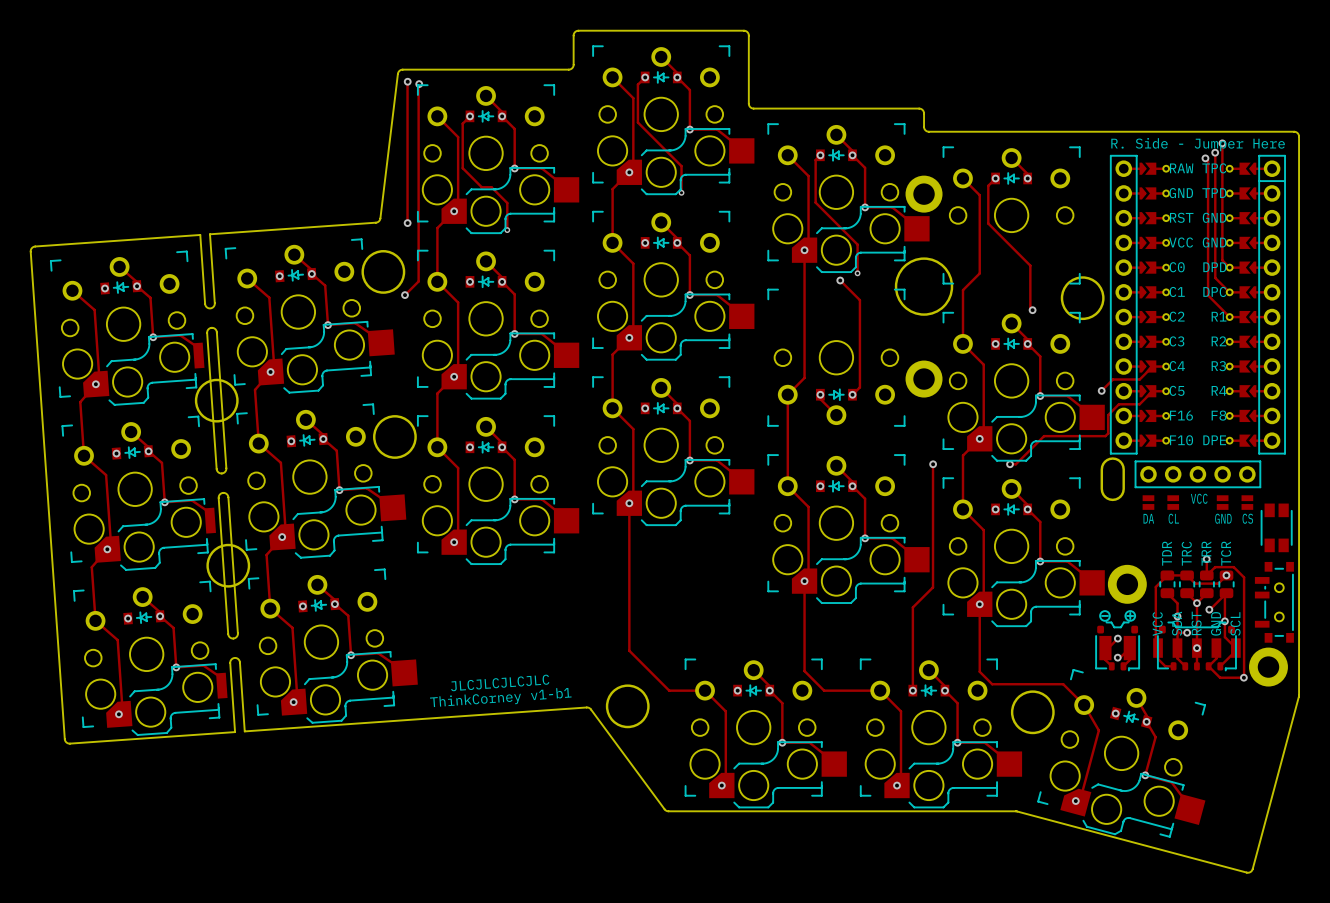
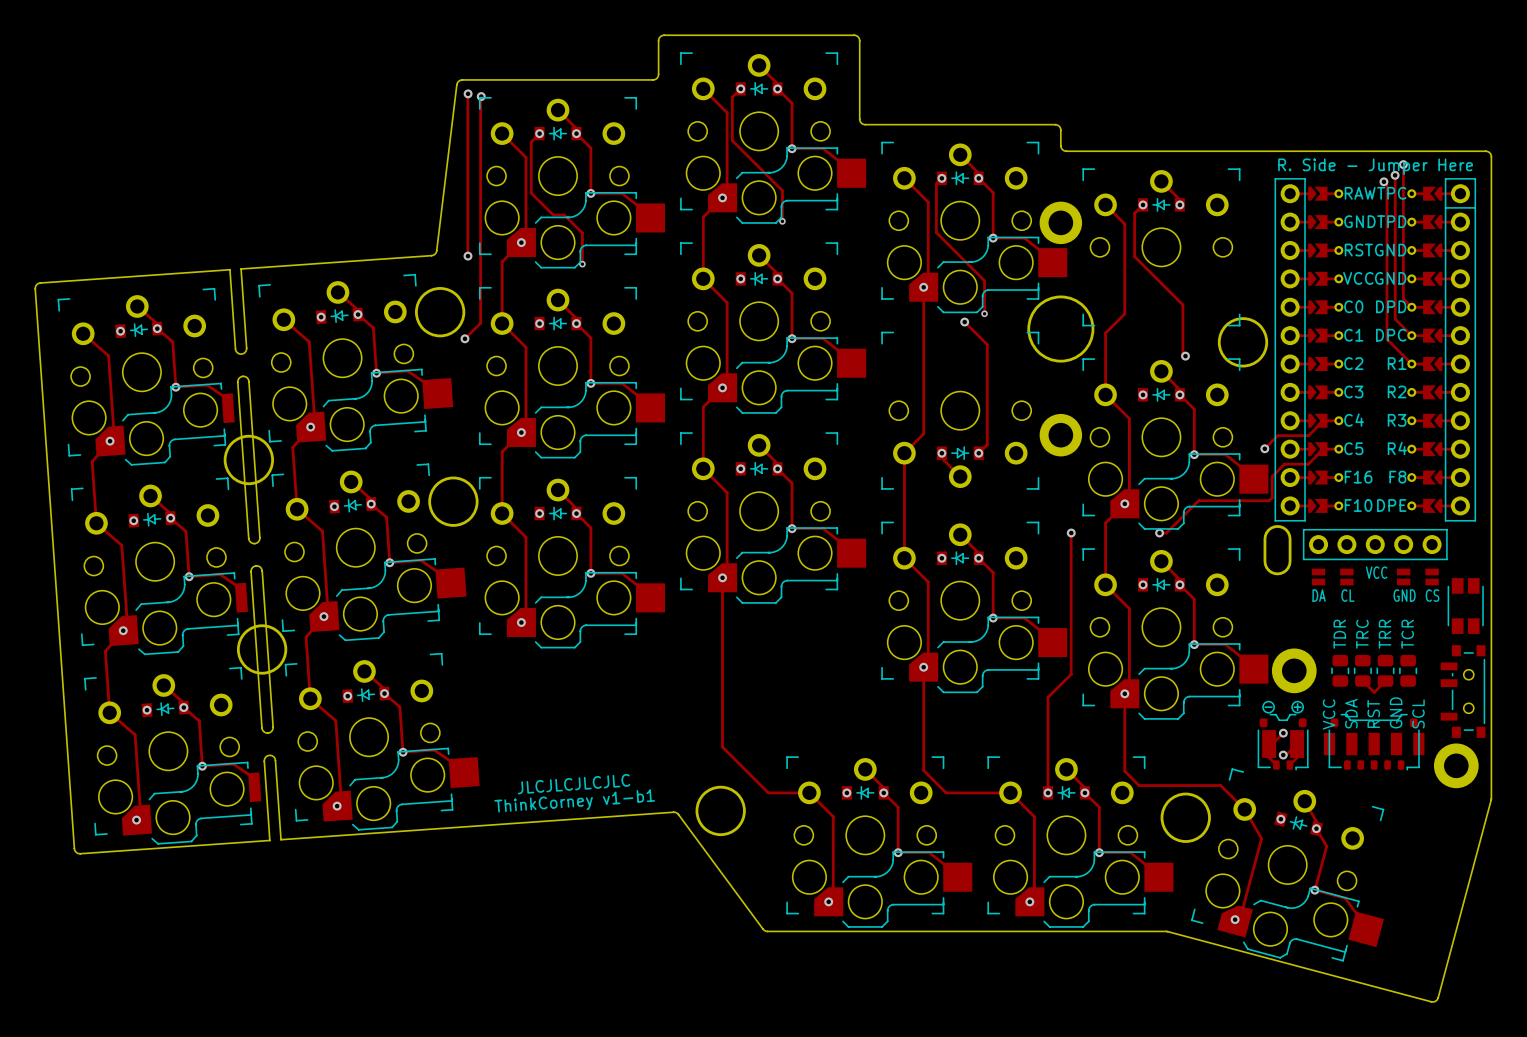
track: (1206, 559) (1206, 575) (1215, 567) (1233, 567) (1244, 577) (1243, 677) (1220, 677) (1208, 666) (1216, 658) (1216, 648) -> none
via: (1206, 559) -> none
track: (1226, 575) (1218, 583) (1195, 583) (1187, 575) (1167, 575) (1155, 587) (1155, 645) -> none
via: (1226, 575) -> none
track: (1167, 593) (1177, 603) (1177, 658) (1185, 666) -> none
track: (1226, 593) (1209, 609) -> none
track: (1224, 594) (1224, 637) (1235, 648) -> none
track: (1196, 603) (1196, 666) -> none
via: (1196, 603) -> none
via: (1209, 609) -> none
via: (1177, 616) -> none
via: (1224, 621) -> none
track: (1177, 632) (1187, 632) -> none
via: (1187, 632) -> none
track: (1158, 648) (1158, 659) (1165, 666) (1173, 666) -> none
via: (1196, 648) -> none
track: (1235, 650) (1220, 666) -> none
via: (1243, 677) -> none

